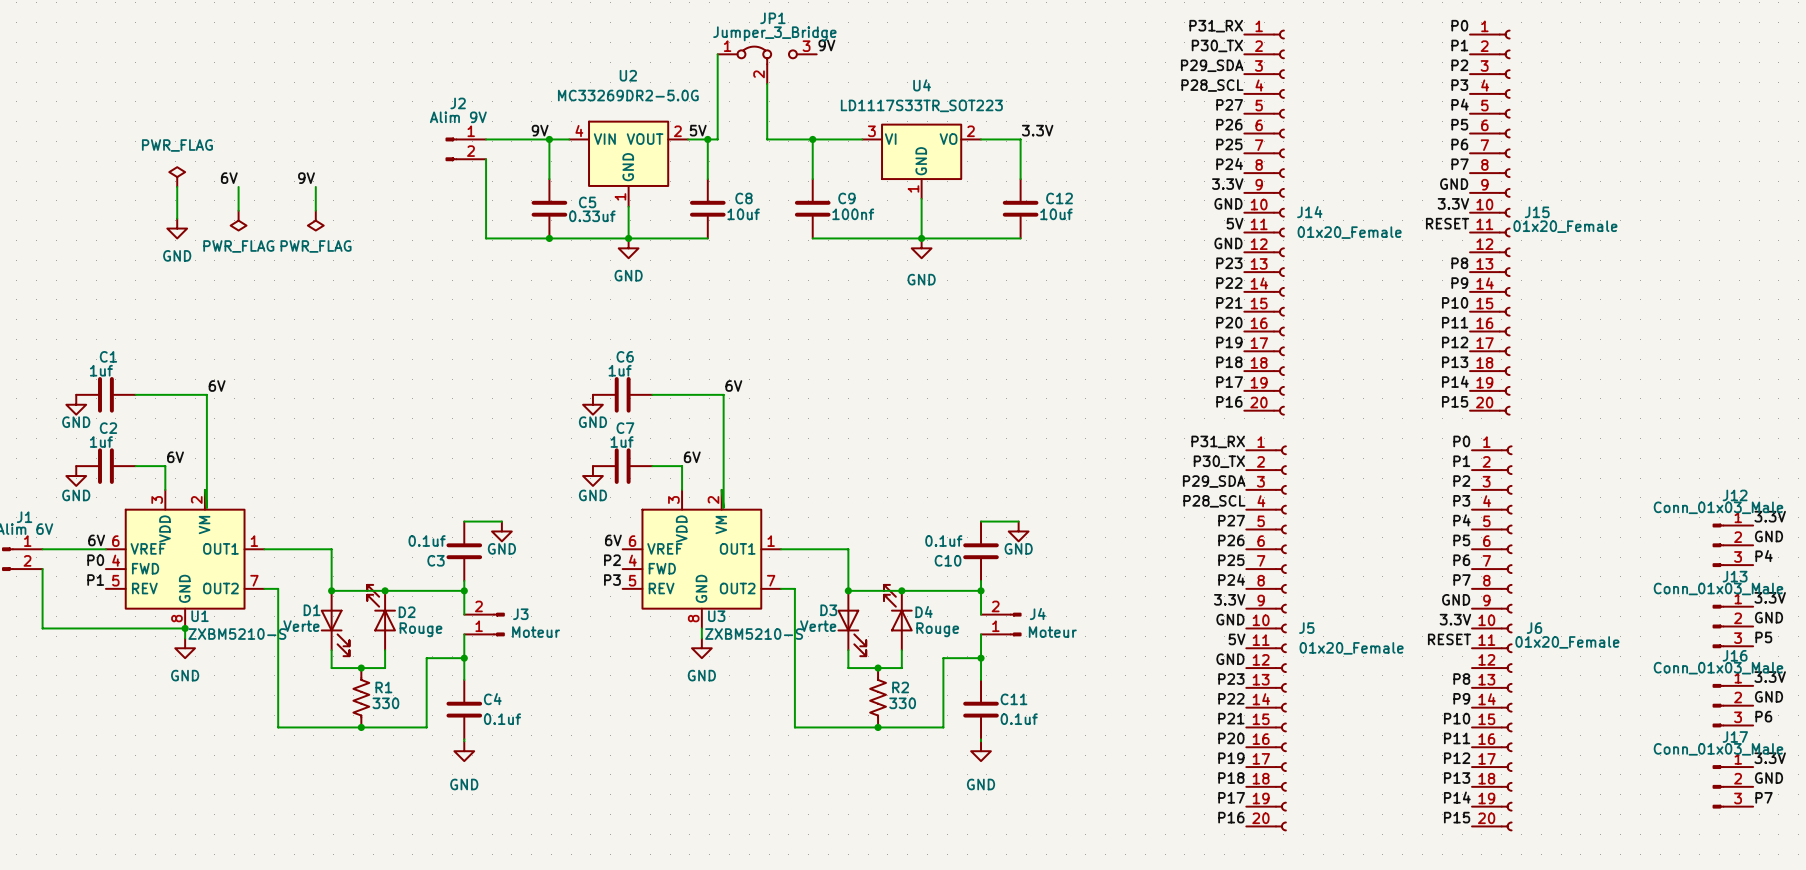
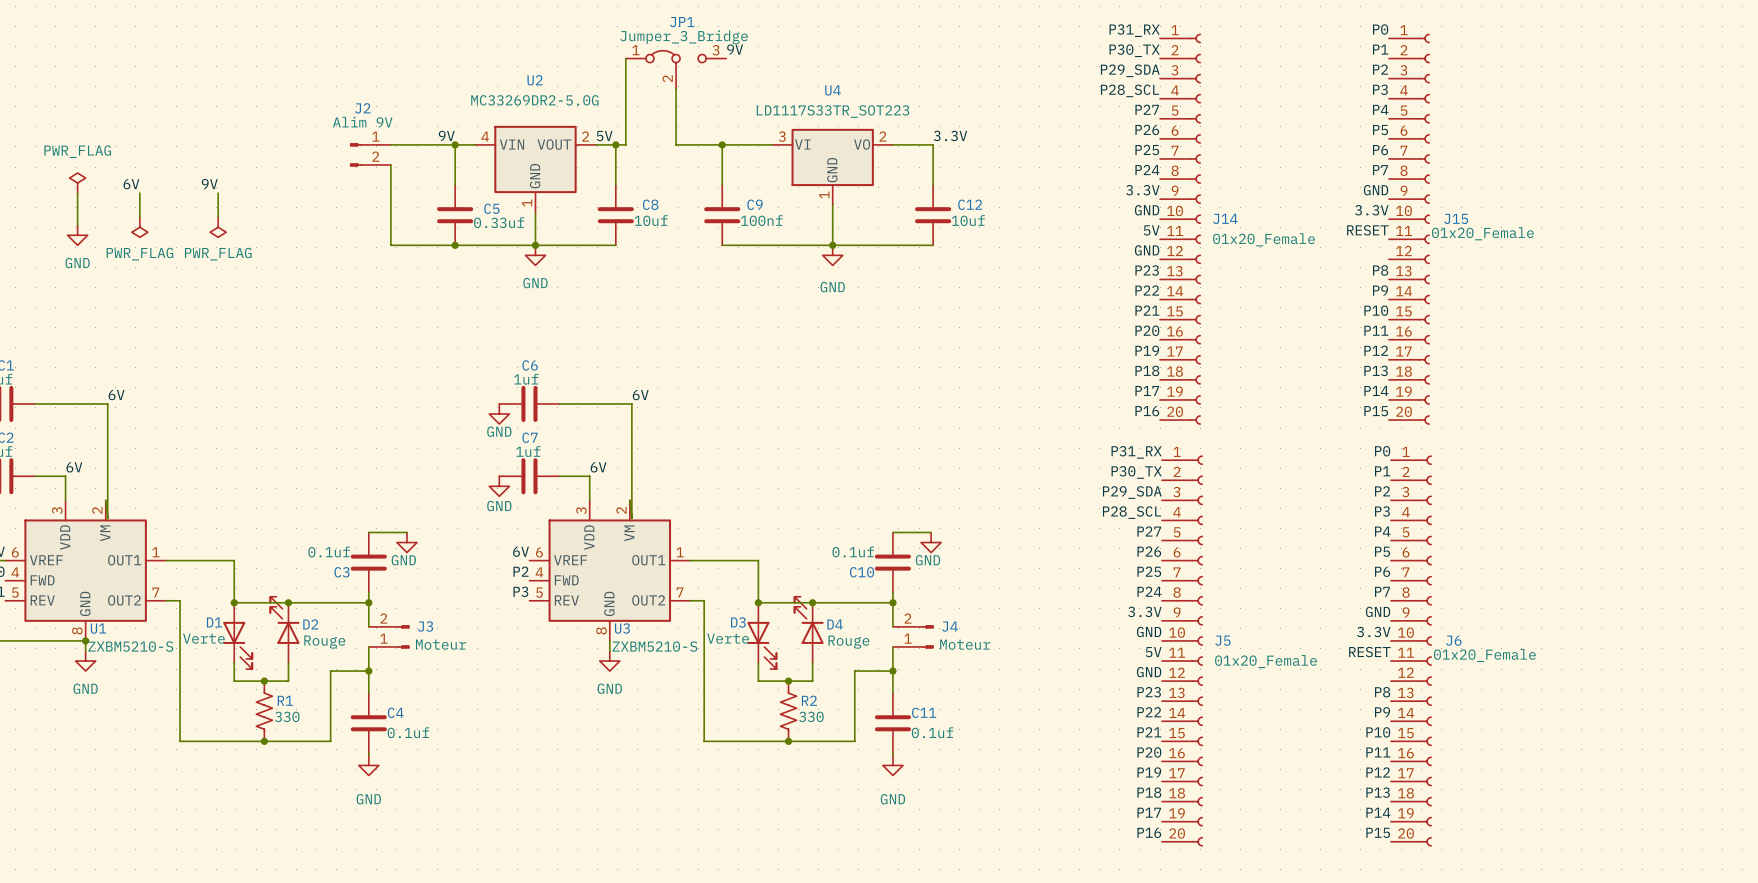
label: 3.3V (1770, 516) -> none
label: GND (1769, 536) -> none
J12: Conn_01x03_Male (1733, 545) -> none
label: P4 (1764, 556) -> none
label: 3.3V (1770, 597) -> none
label: GND (1769, 617) -> none
J13: Conn_01x03_Male (1733, 626) -> none
label: P5 (1763, 637) -> none
label: 3.3V (1770, 677) -> none
label: GND (1769, 696) -> none
J16: Conn_01x03_Male (1733, 705) -> none
label: P6 (1763, 716) -> none
label: 3.3V (1770, 758) -> none
label: GND (1769, 778) -> none
J17: Conn_01x03_Male (1733, 786) -> none
label: P7 (1764, 797) -> none

